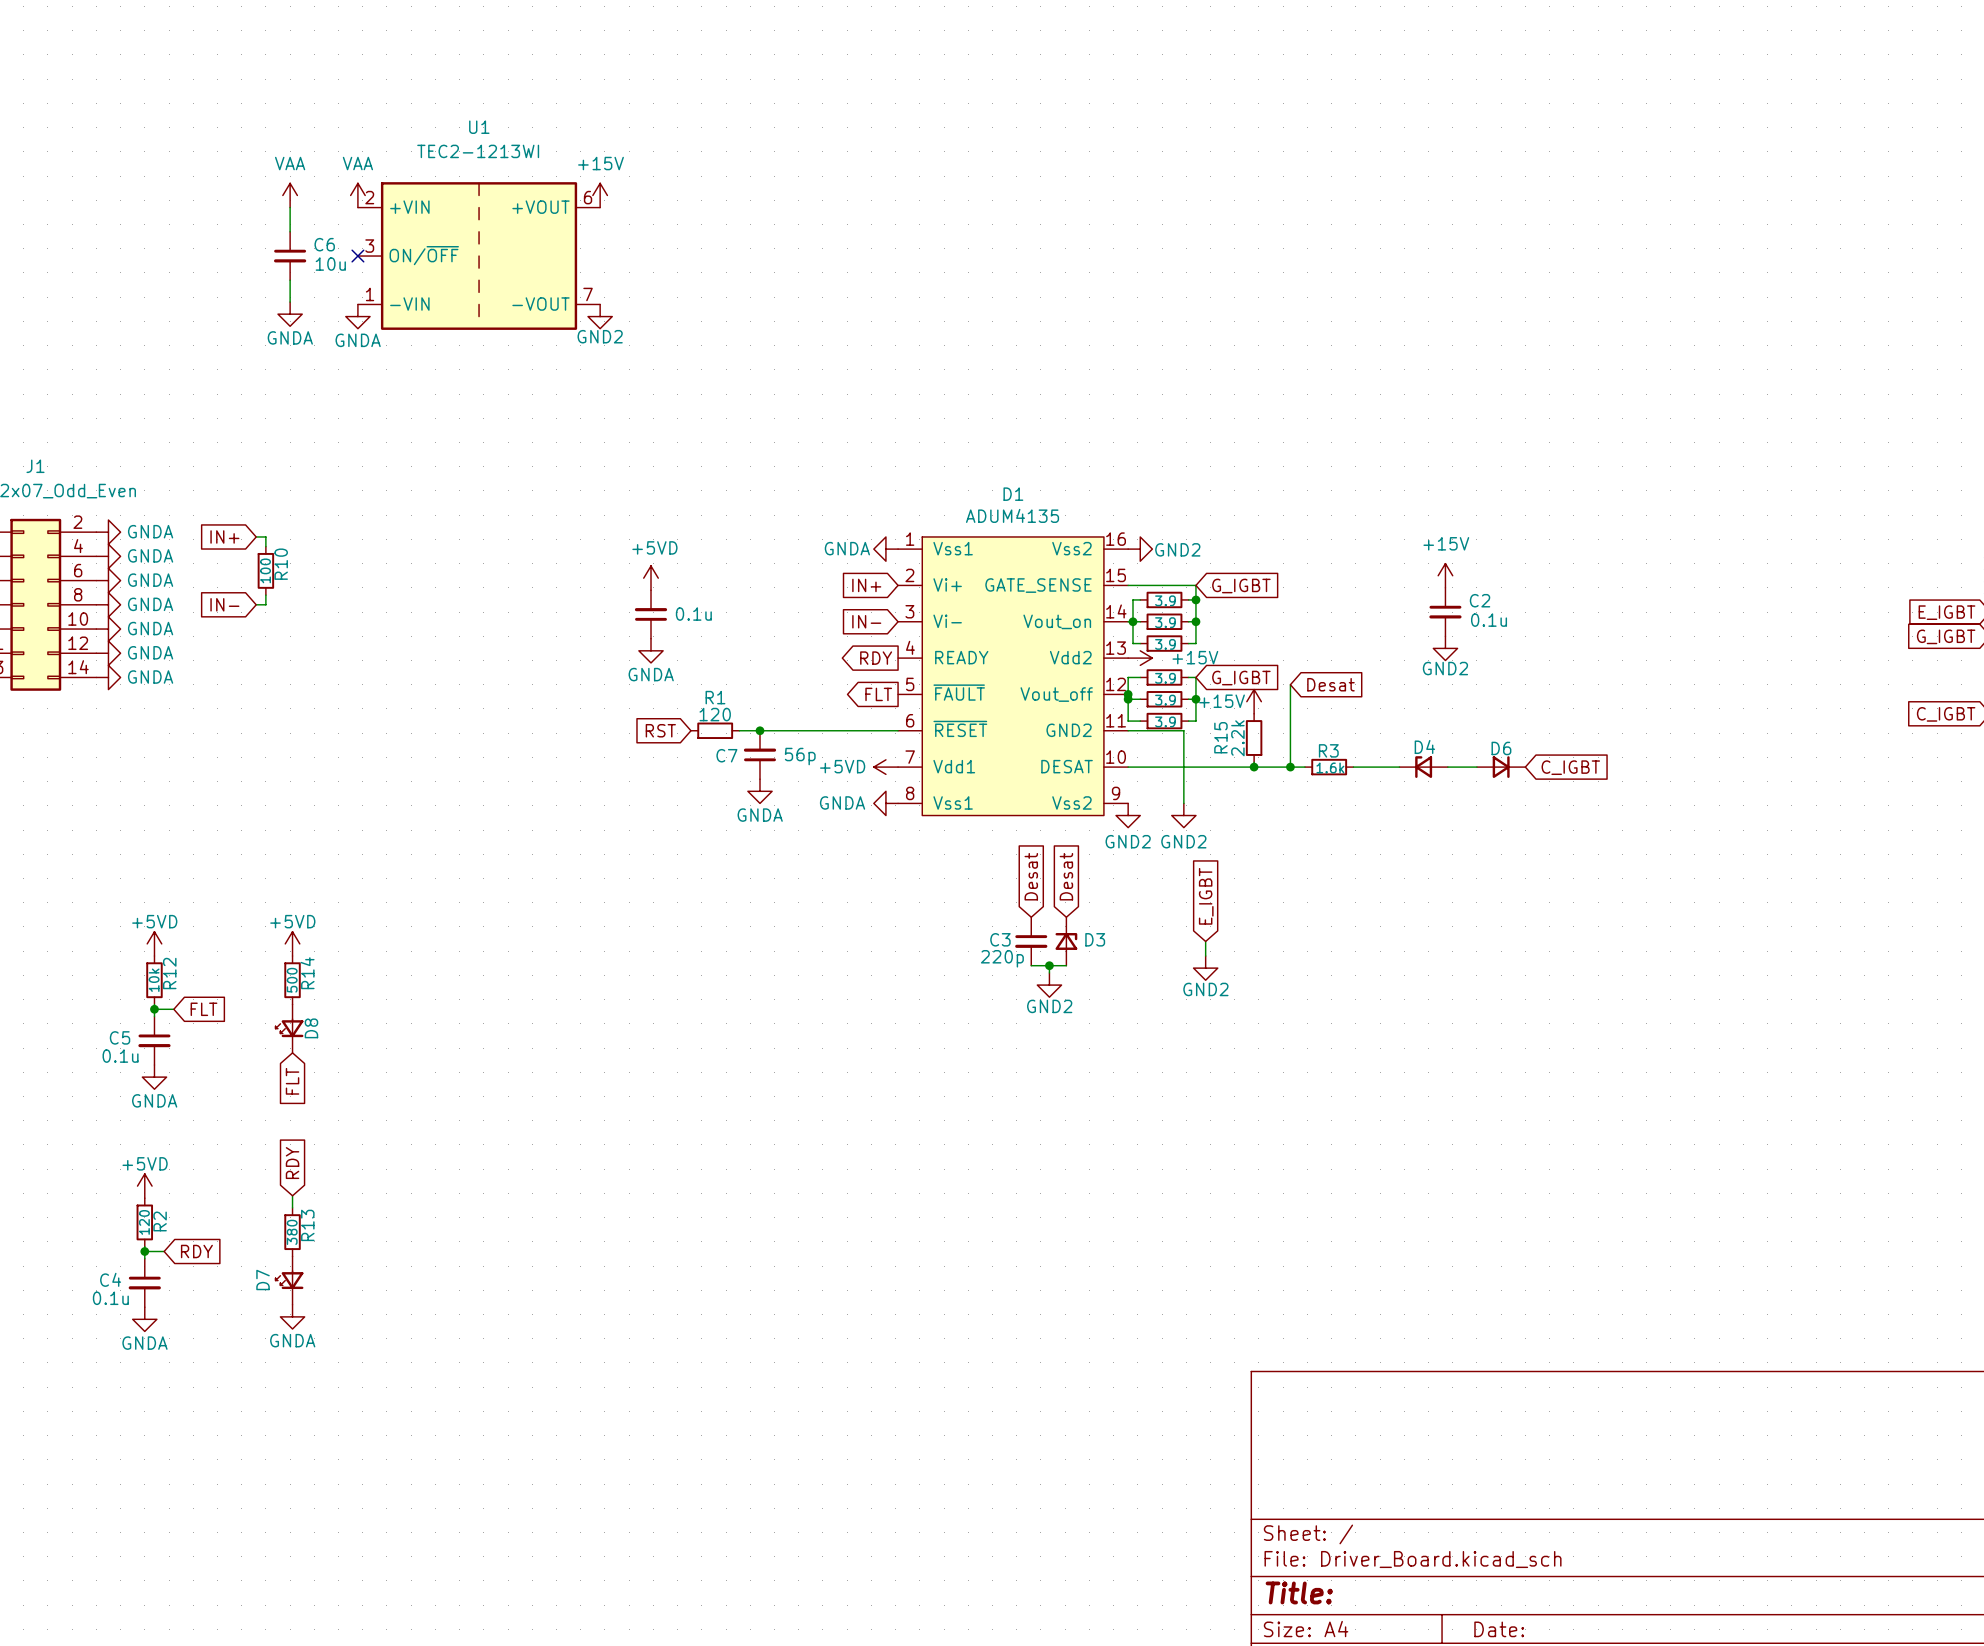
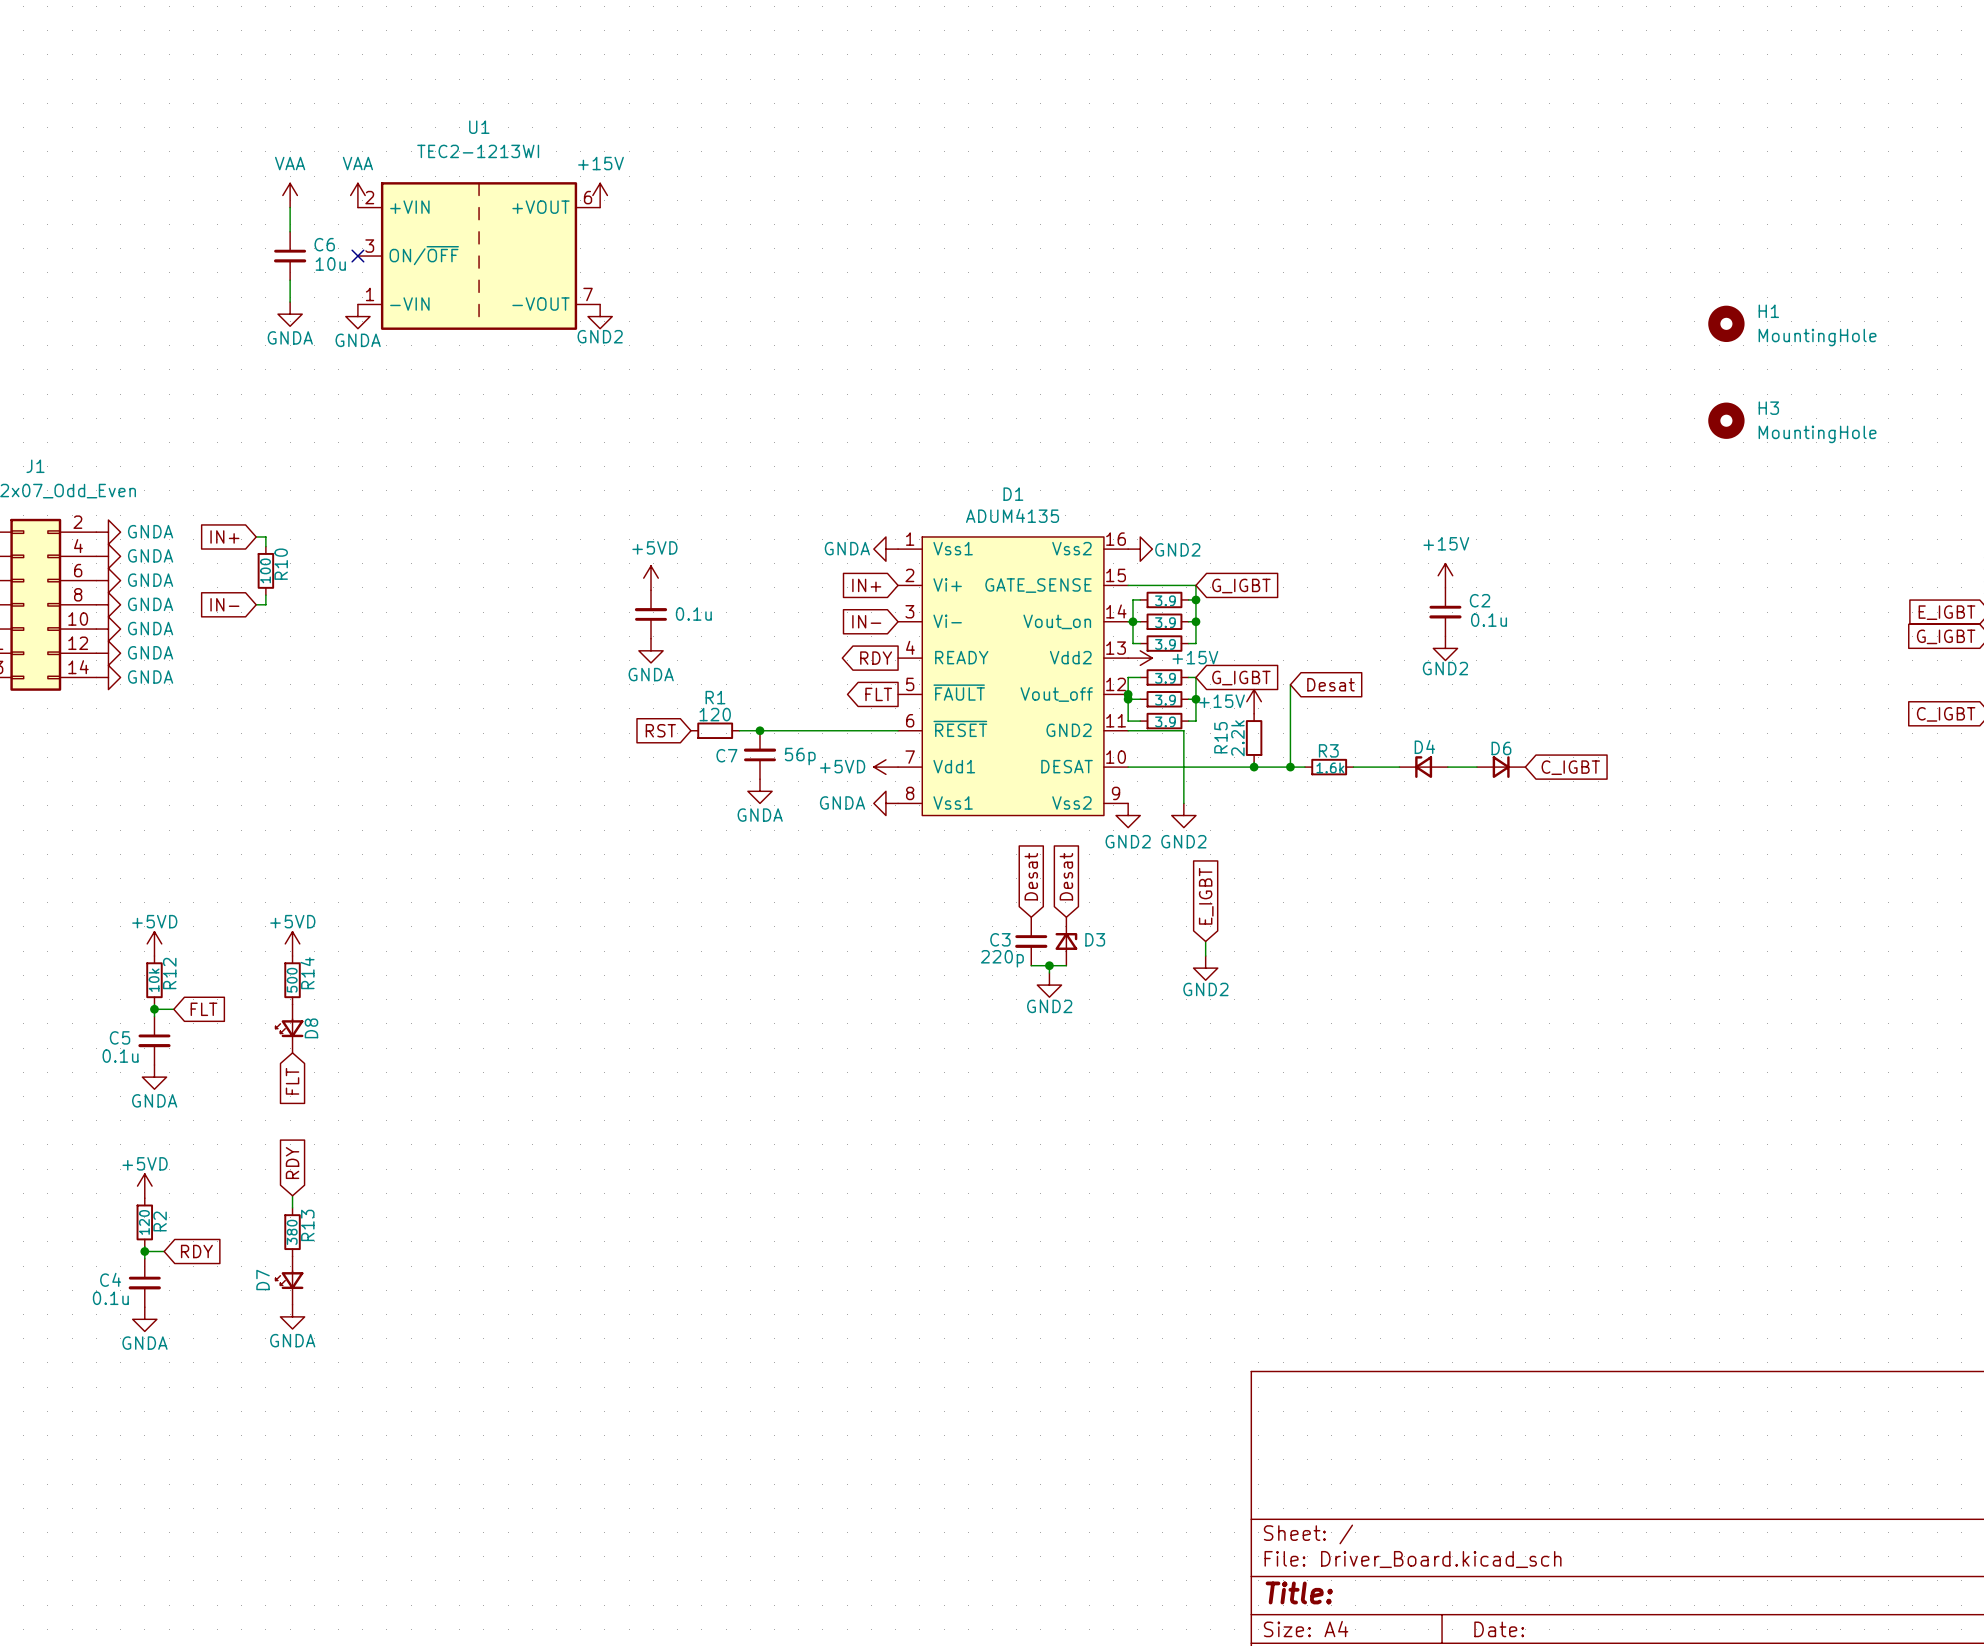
H1: none -> MountingHole (1726, 323)
H3: none -> MountingHole (1726, 420)

